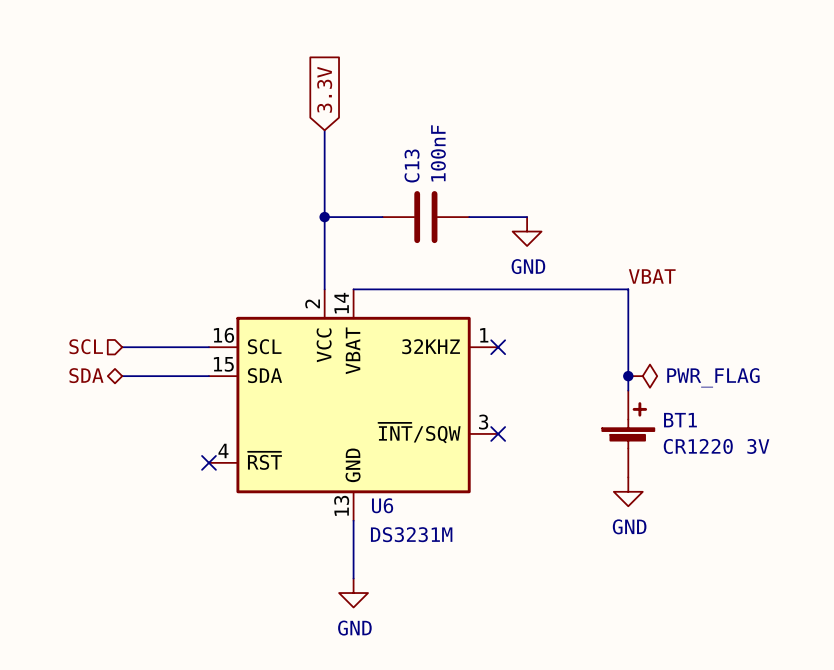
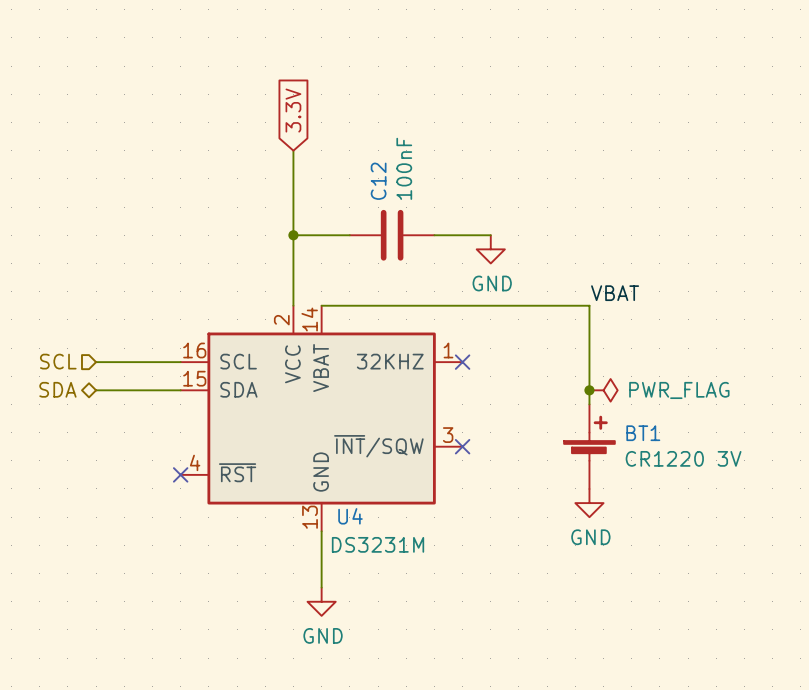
C13 name: C13 (412, 165) -> C12 (378, 181)
U6 name: U6 (382, 505) -> U4 (350, 516)

